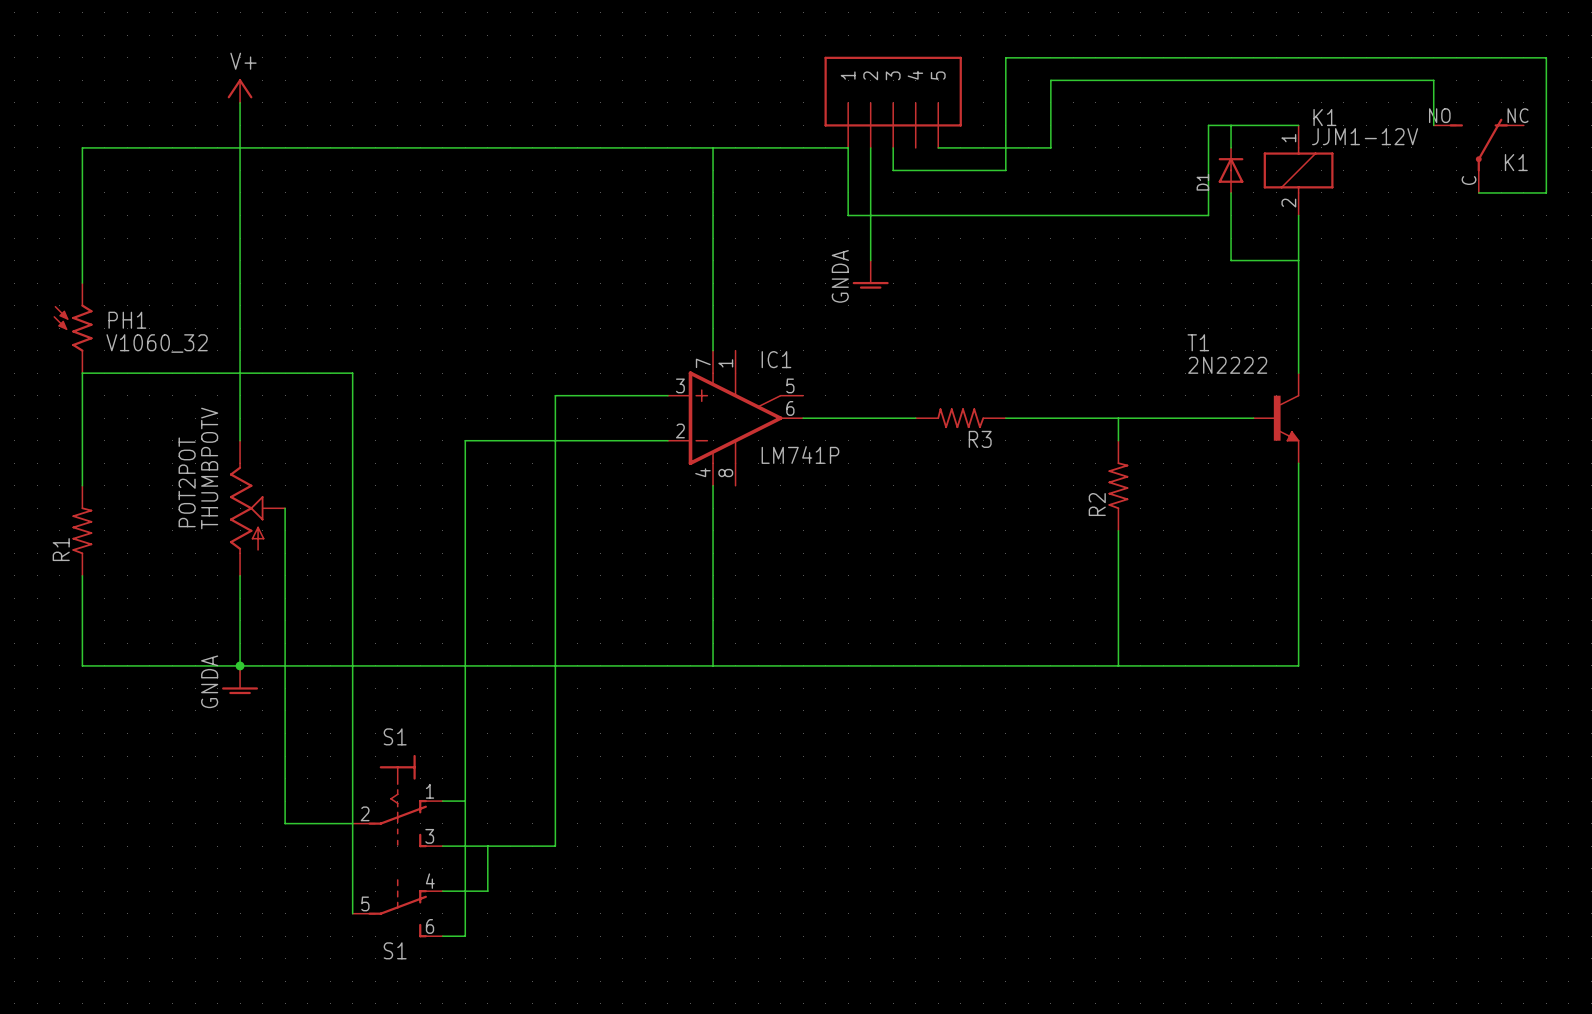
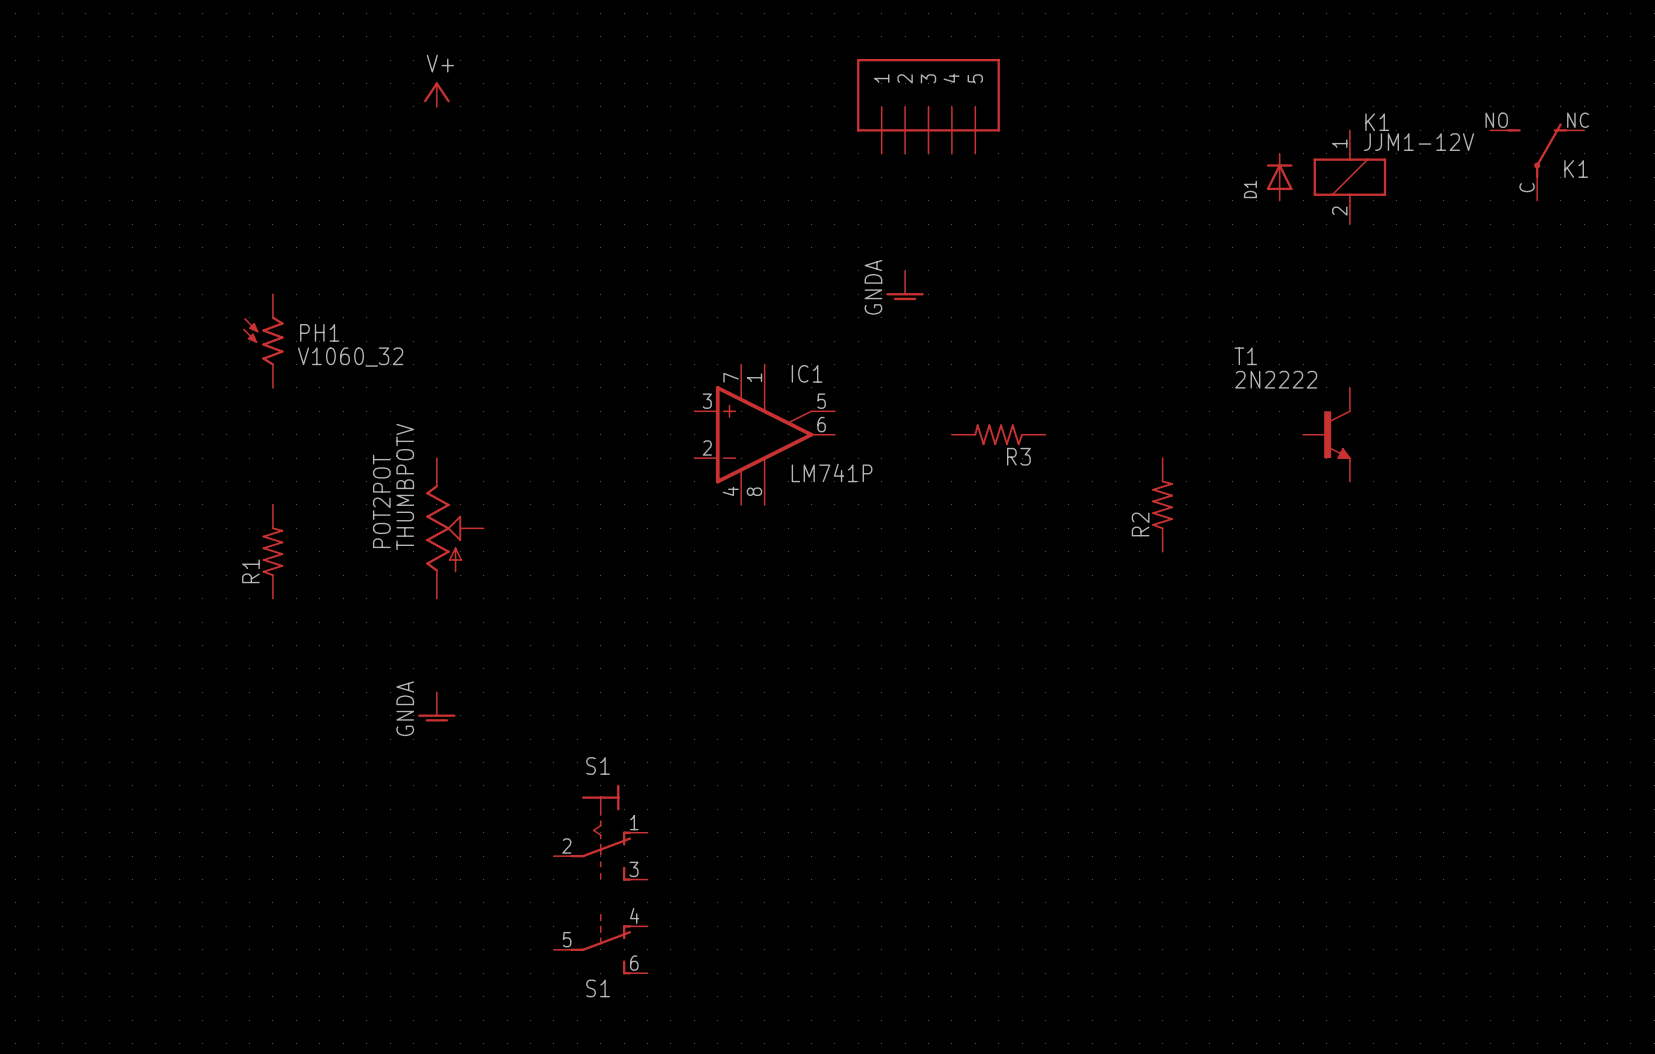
power symbol position: V+ (240, 91) -> V+ (436, 94)
wire: (240, 102) (240, 440) -> none
wire: (1231, 125) (1231, 147) -> none
wire: (1298, 125) (1208, 125) (1208, 215) (848, 215) (848, 147) (82, 147) (82, 283) -> none
wire: (1433, 125) (1433, 80) (1050, 80) (1050, 147) (938, 147) -> none
wire: (713, 147) (713, 350) -> none
wire: (870, 147) (870, 260) -> none
wire: (893, 147) (893, 170) (1005, 170) (1005, 57) (1546, 57) (1546, 192) (1478, 192) -> none
wire: (1231, 192) (1231, 260) (1298, 260) -> none
wire: (1298, 215) (1298, 373) -> none
PH1 position: (73, 328) -> (263, 341)
wire: (667, 395) (555, 395) (555, 846) (442, 846) -> none
wire: (803, 418) (915, 418) -> none
wire: (1005, 418) (1253, 418) -> none
wire: (1118, 418) (1118, 440) -> none
wire: (667, 440) (465, 440) (465, 936) (442, 936) -> none
wire: (1298, 463) (1298, 665) (82, 665) (82, 575) -> none
wire: (82, 485) (82, 373) (352, 373) (352, 913) -> none
wire: (713, 485) (713, 665) -> none
POT2POT position: (257, 508) -> (454, 528)
wire: (285, 508) (285, 823) (352, 823) -> none
R1 position: (82, 530) -> (272, 551)
wire: (1118, 530) (1118, 665) -> none
wire: (240, 575) (240, 665) -> none
junction: (240, 665) -> none
power symbol position: GNDA (240, 680) -> GNDA (436, 706)
S1 position: (397, 801) -> (600, 832)
wire: (442, 801) (465, 801) -> none
wire: (487, 846) (487, 891) (442, 891) -> none
S1 position: (397, 908) -> (600, 944)

